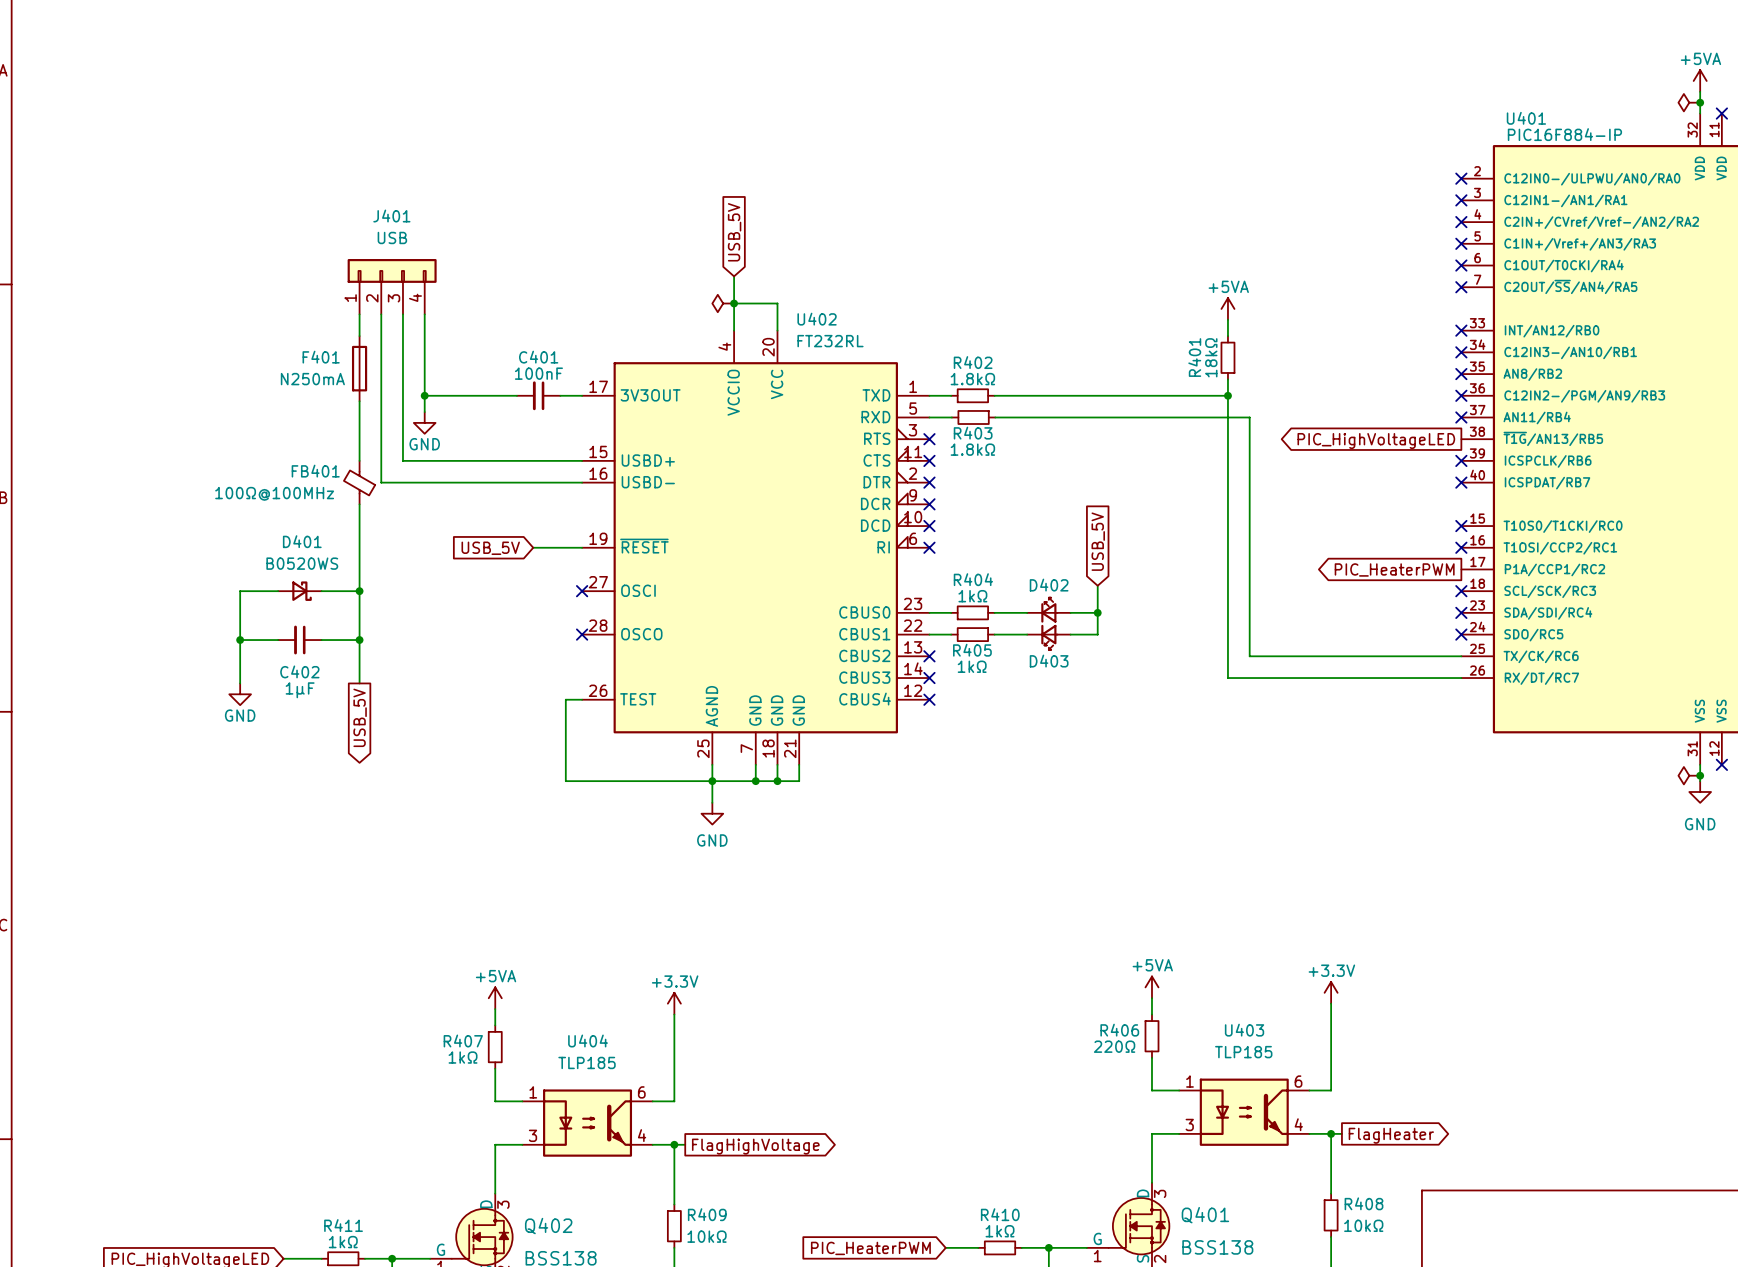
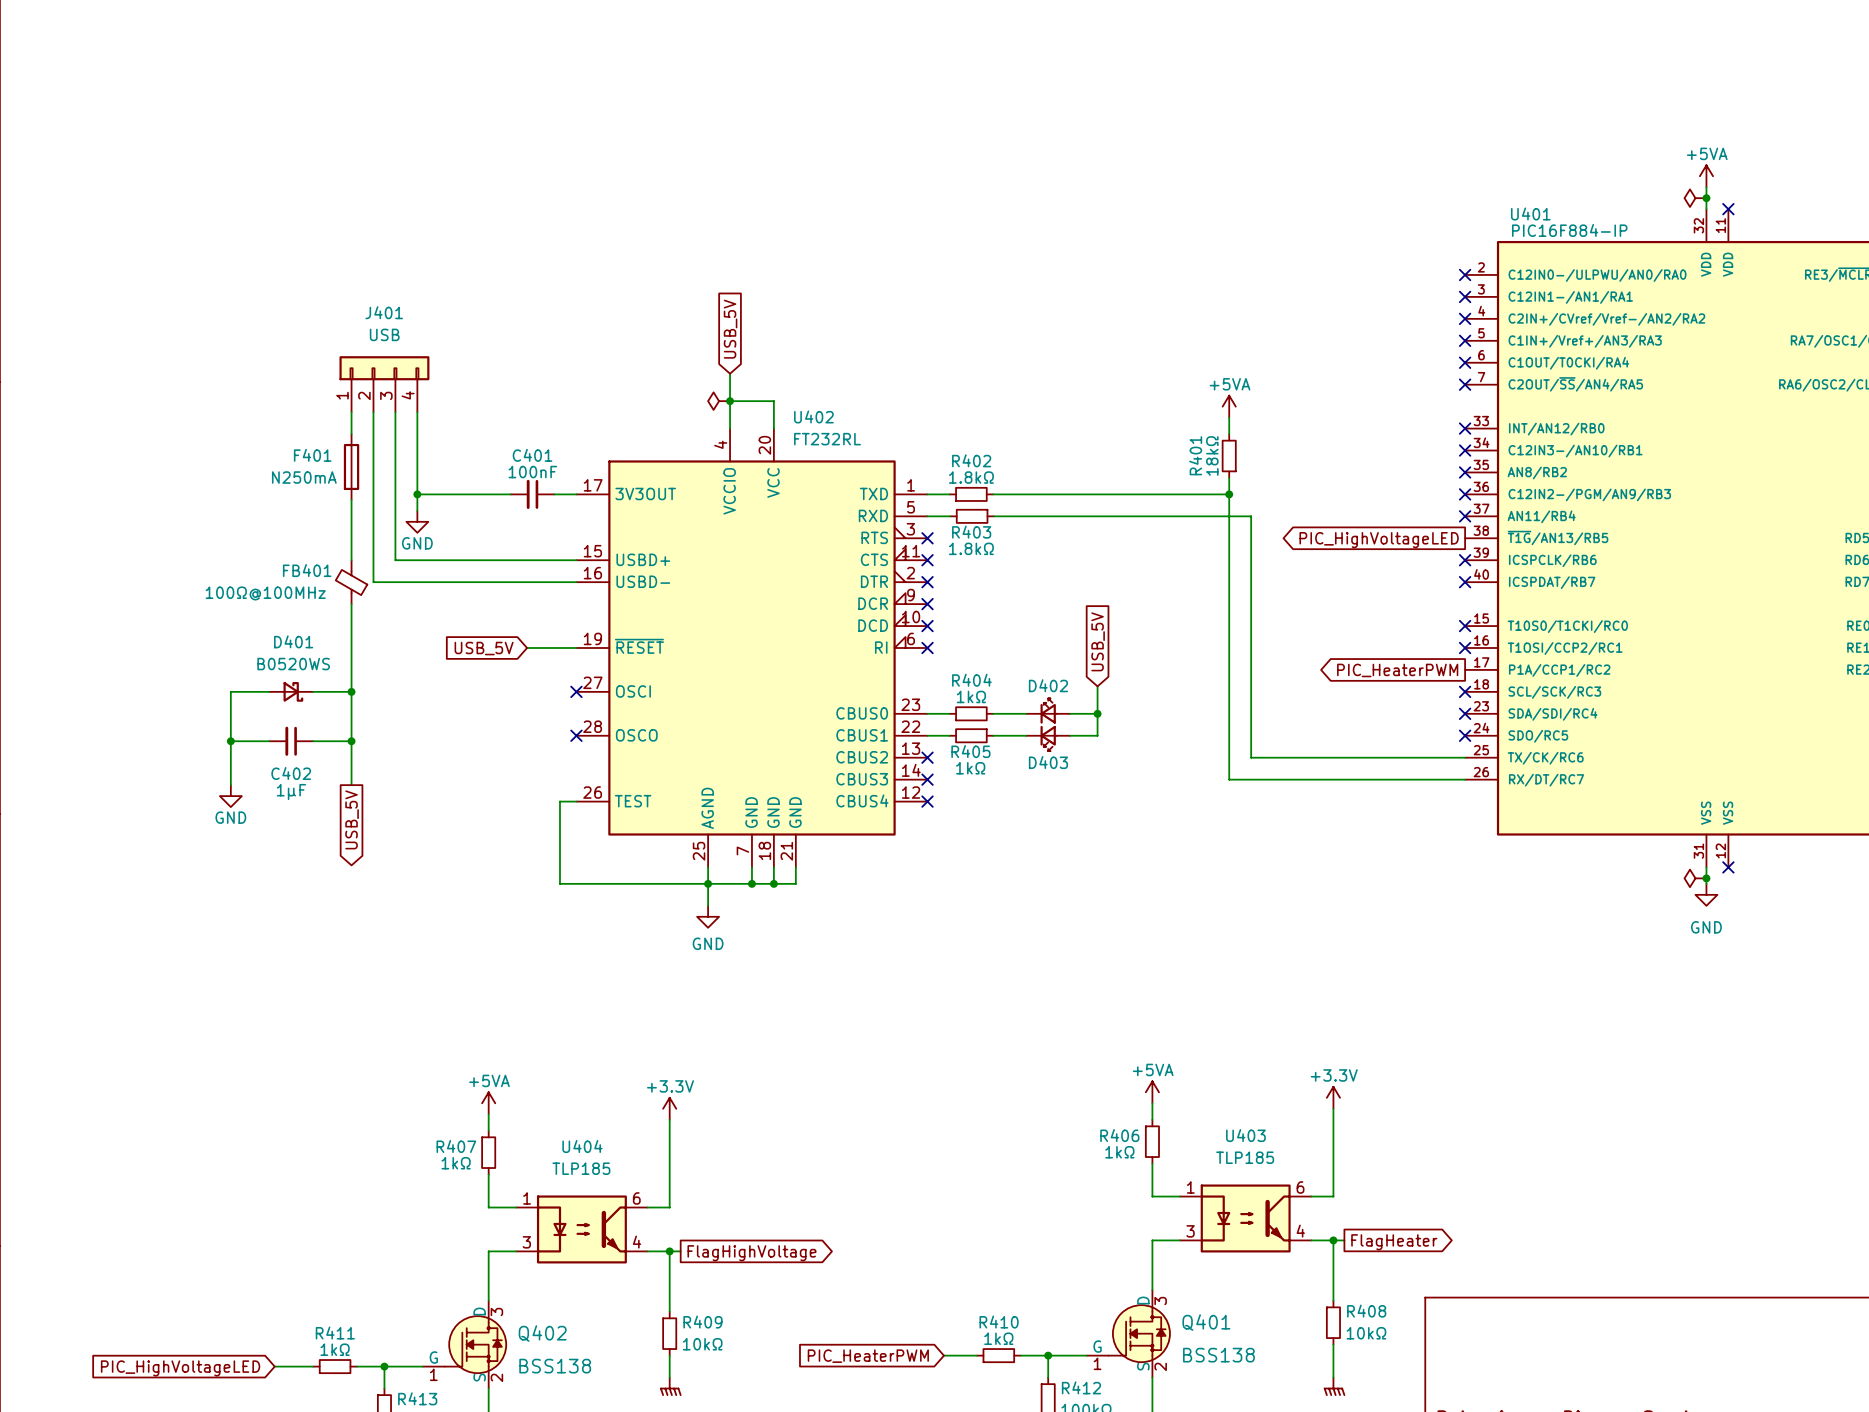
R406 value: 220Ω (1114, 1046) -> 1kΩ (1119, 1152)

